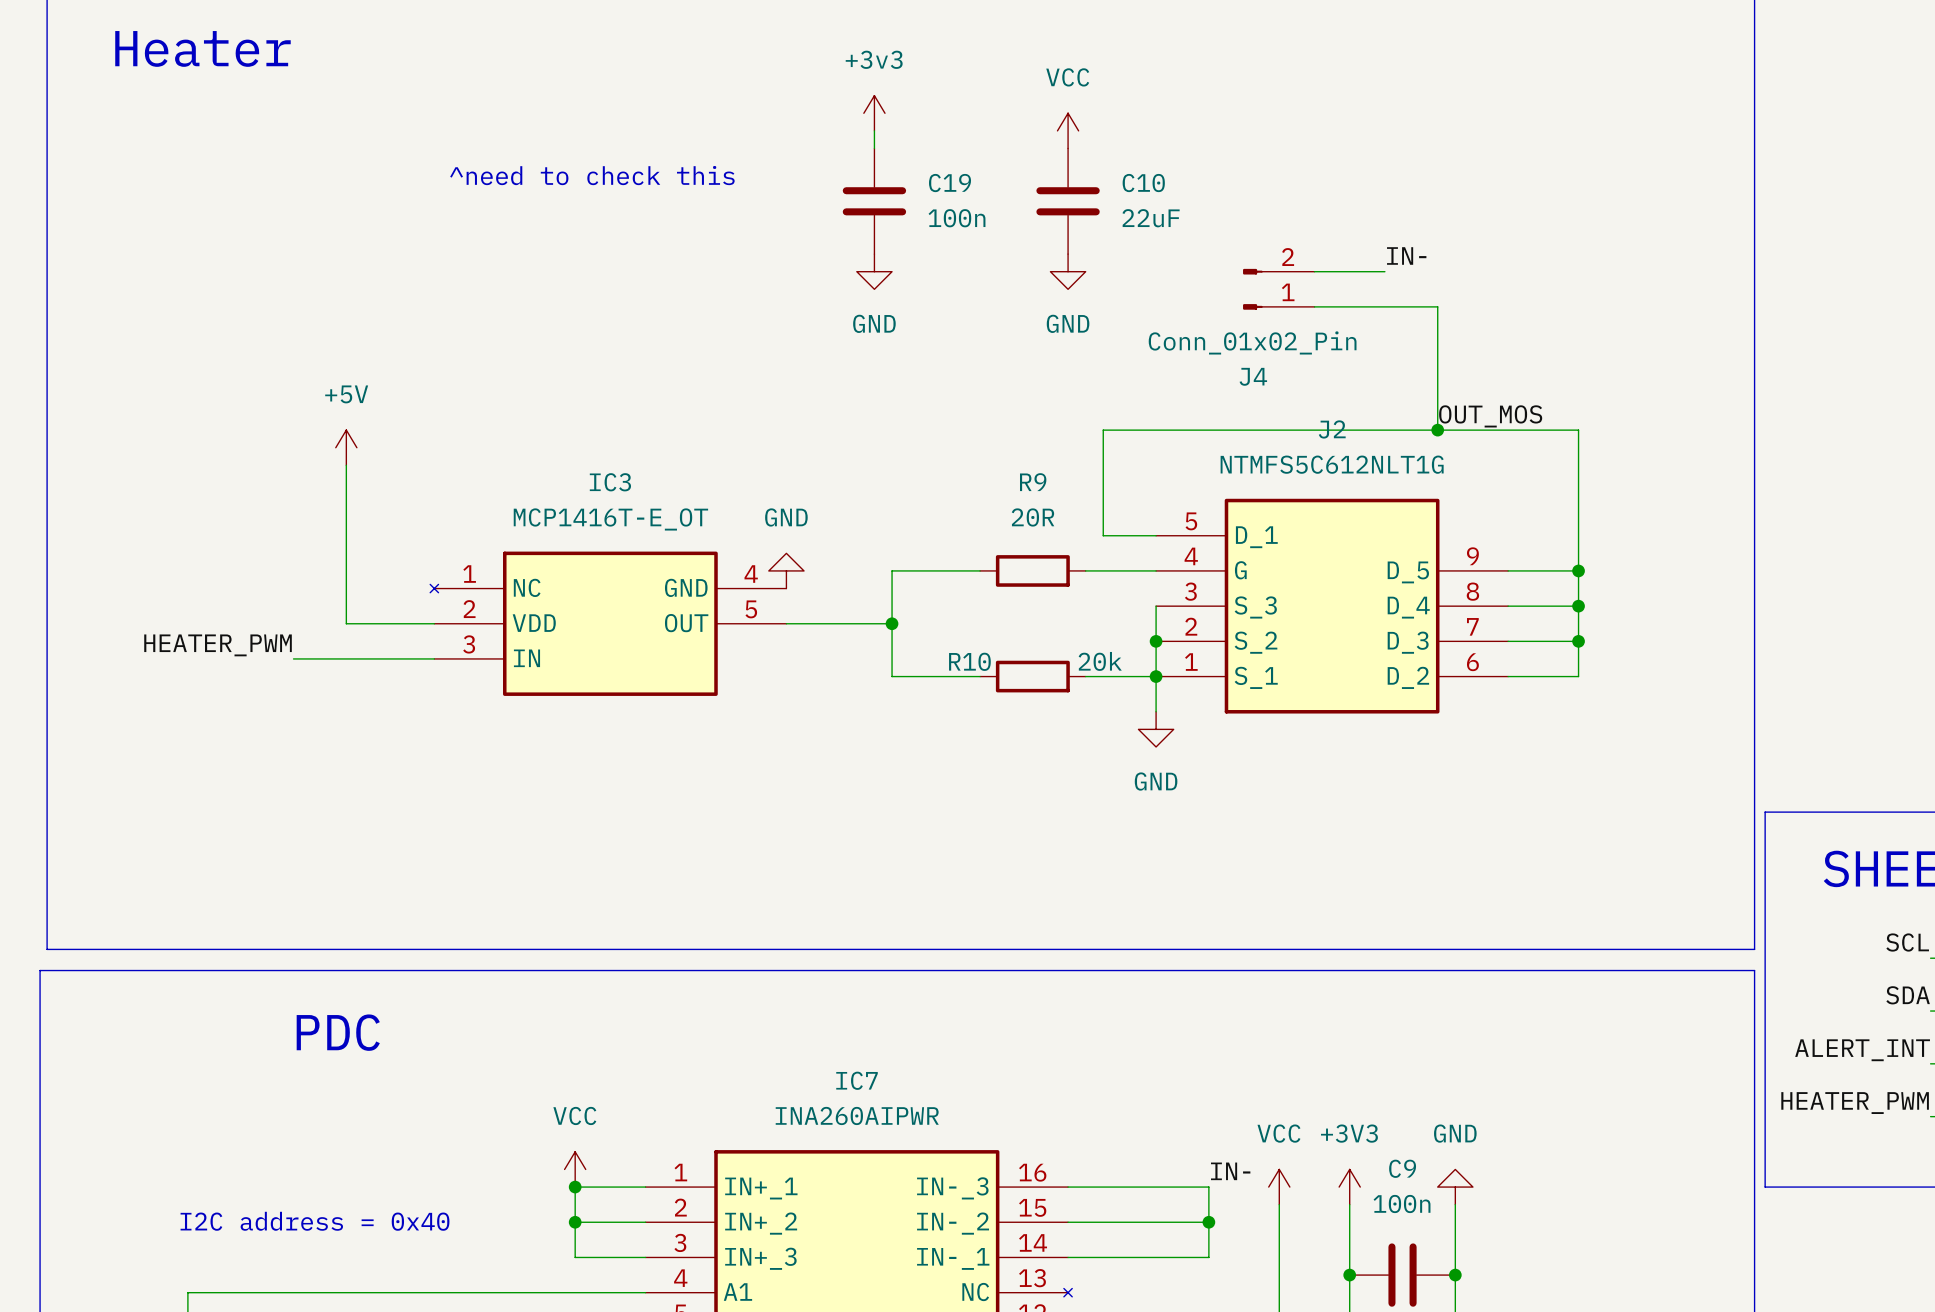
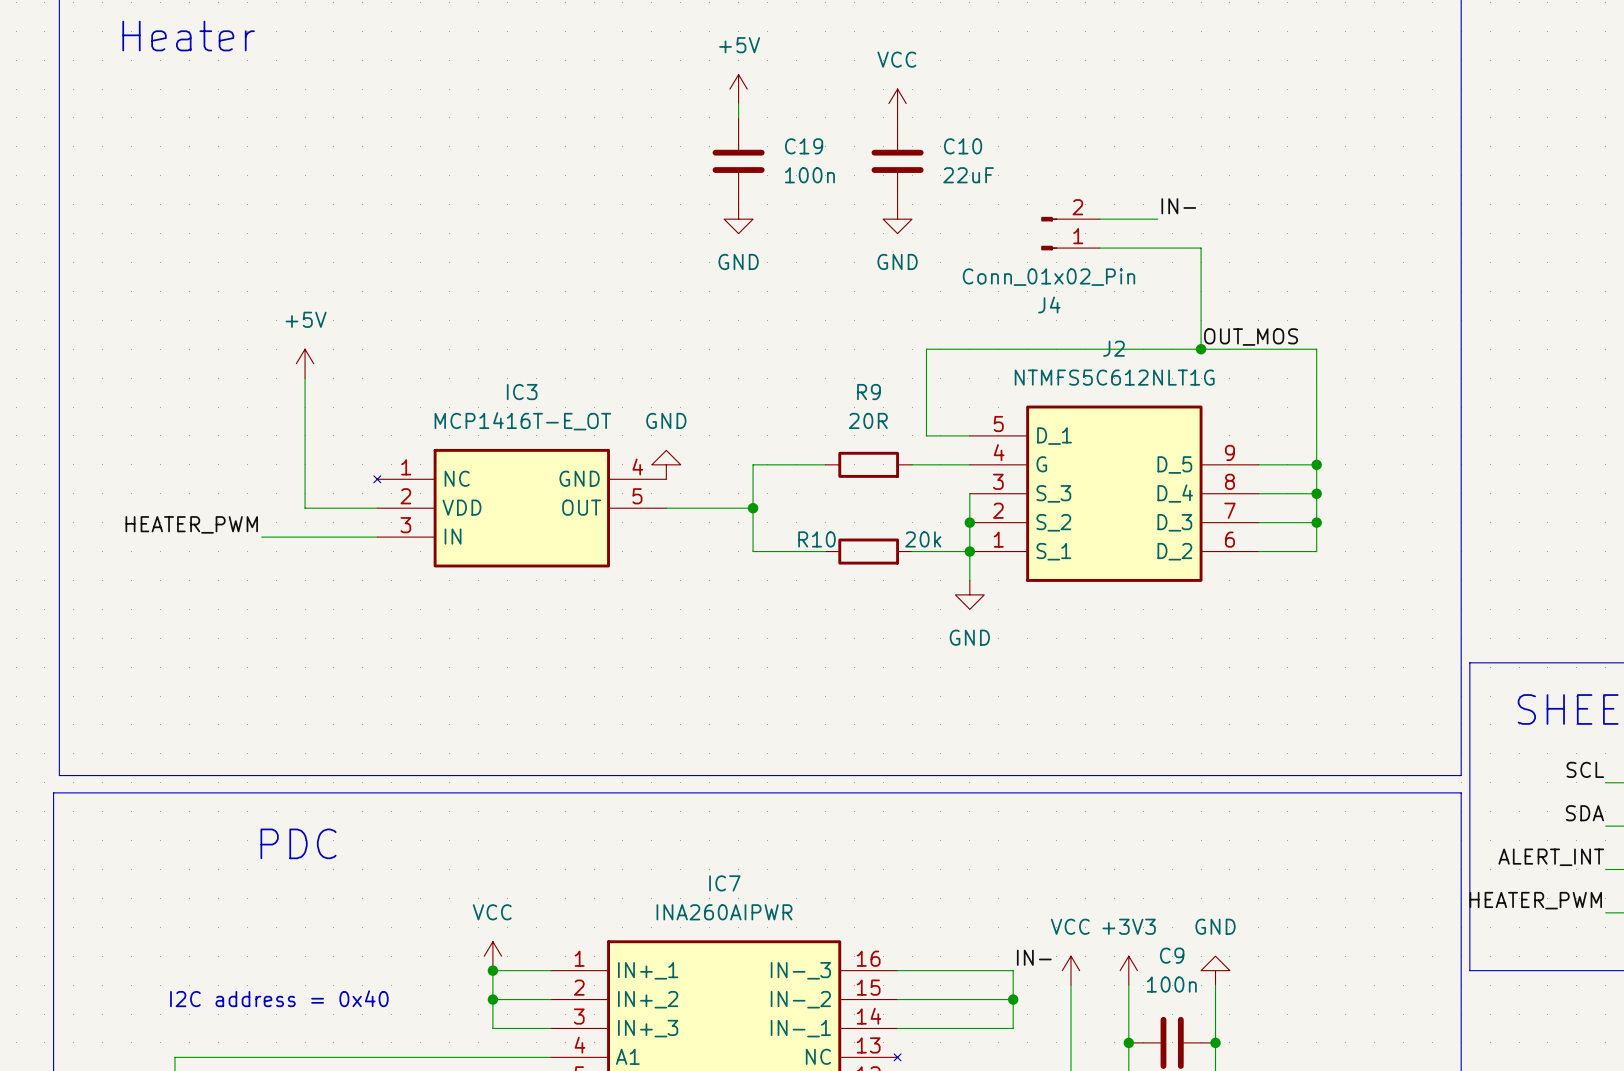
power symbol: +3v3 (874, 113) -> +5V (738, 89)
text: ^need to check this (592, 175) -> none

